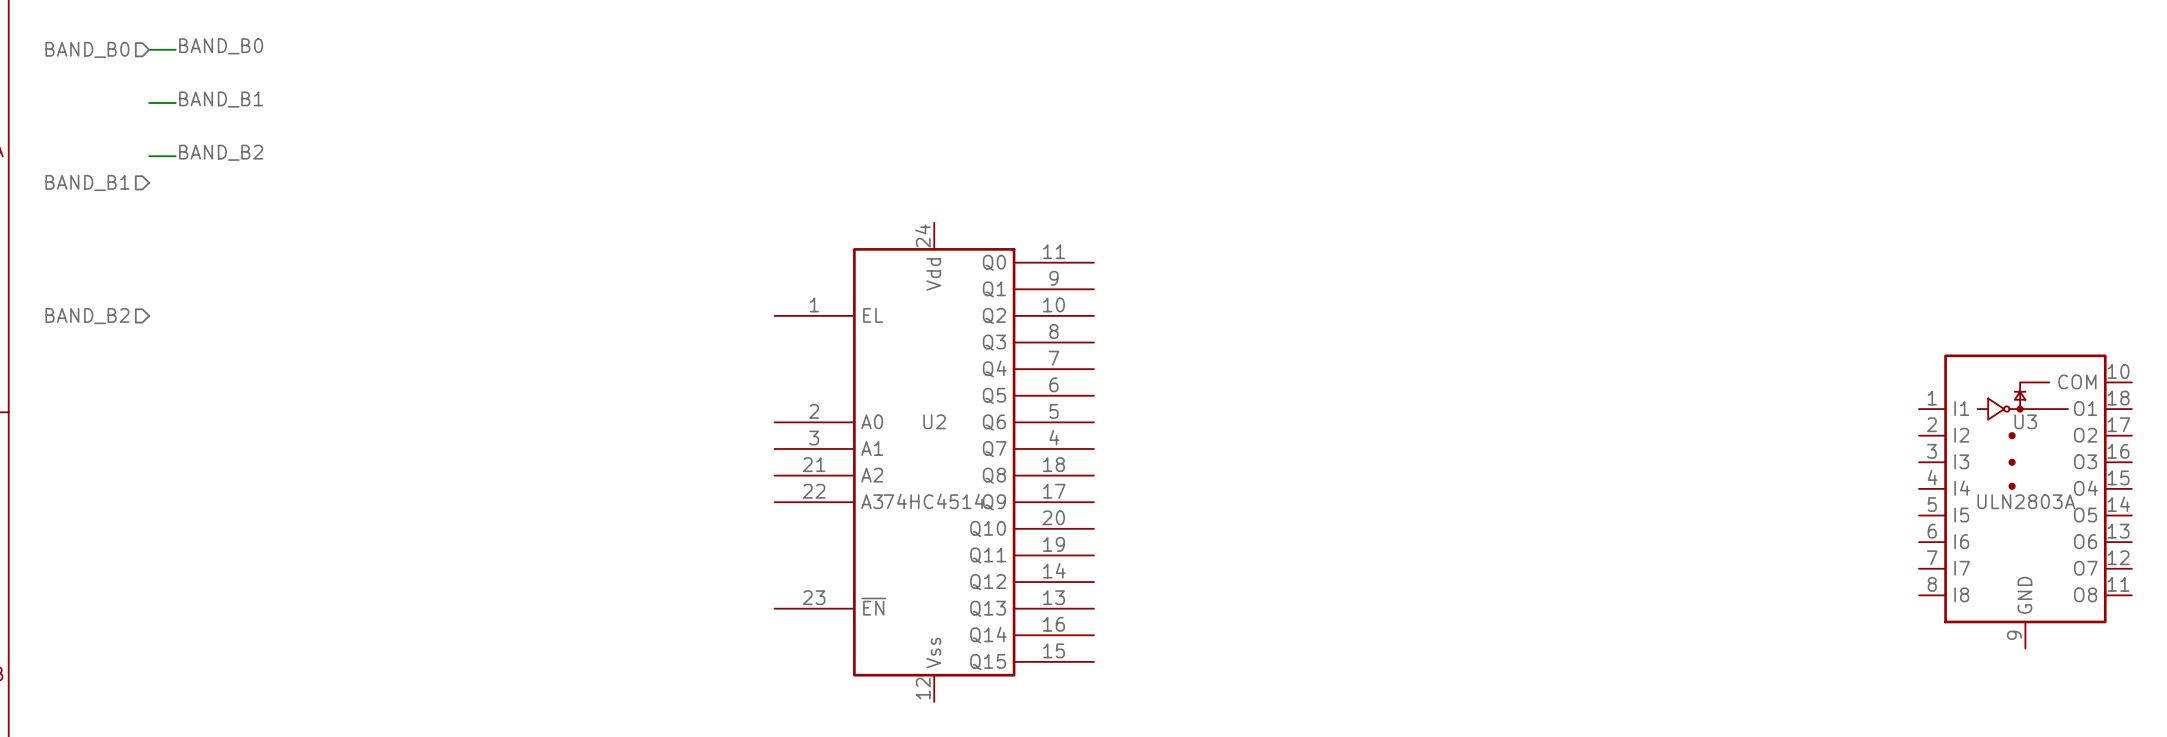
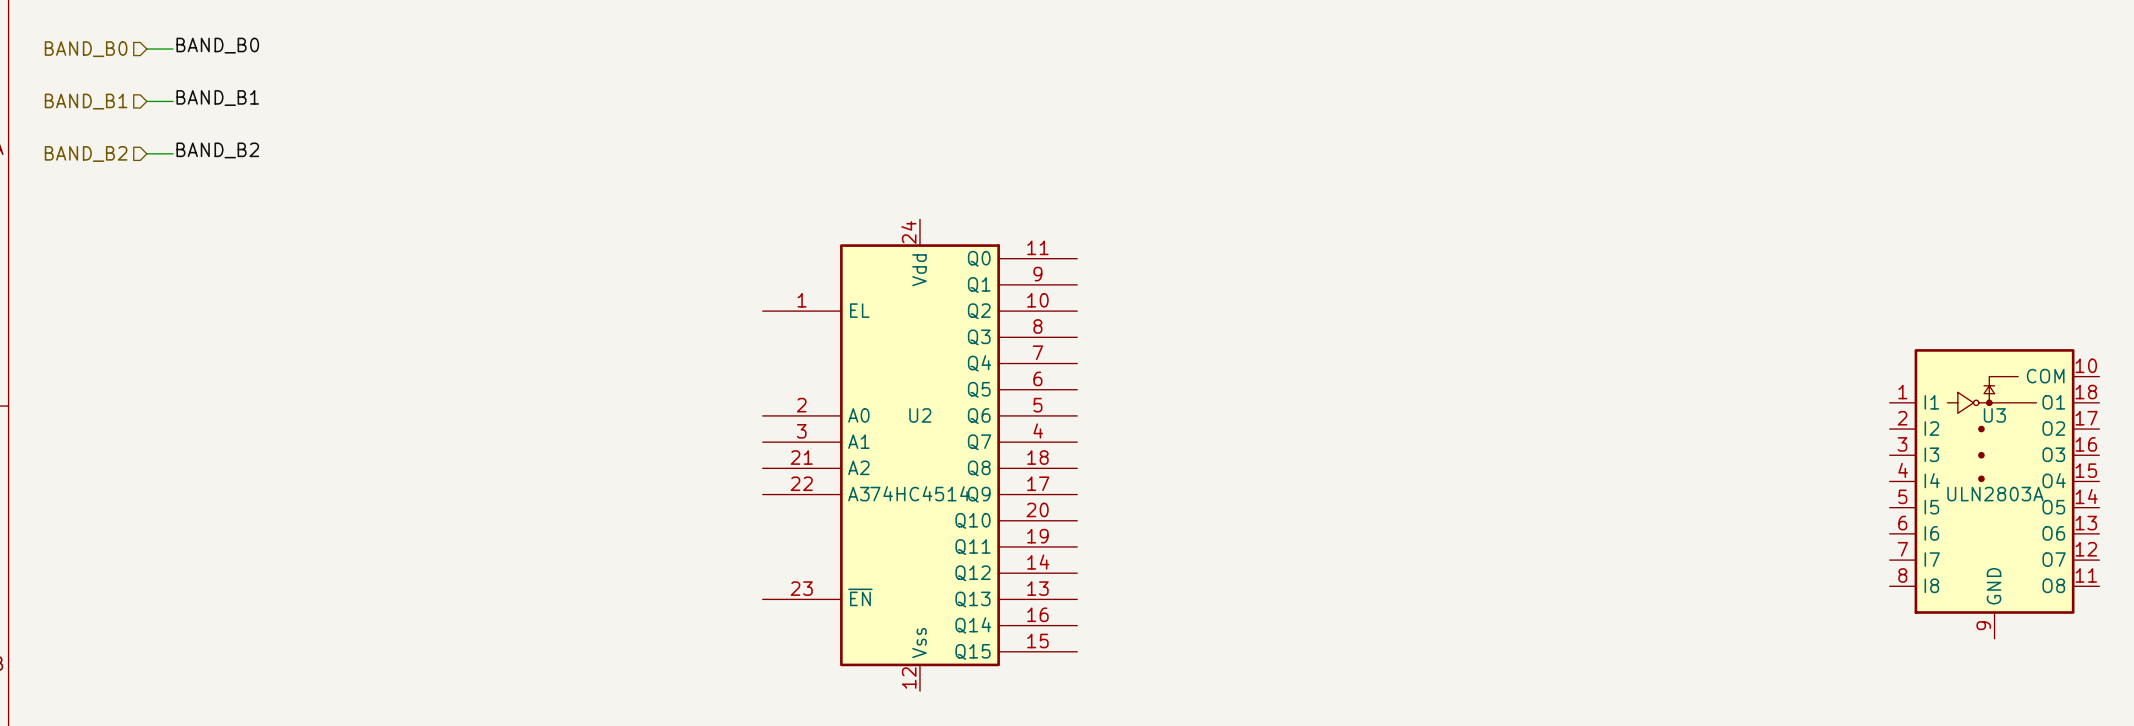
hierarchical label position: BAND_B1 (87, 182) -> BAND_B1 (86, 101)
hierarchical label position: BAND_B2 (87, 316) -> BAND_B2 (86, 153)

